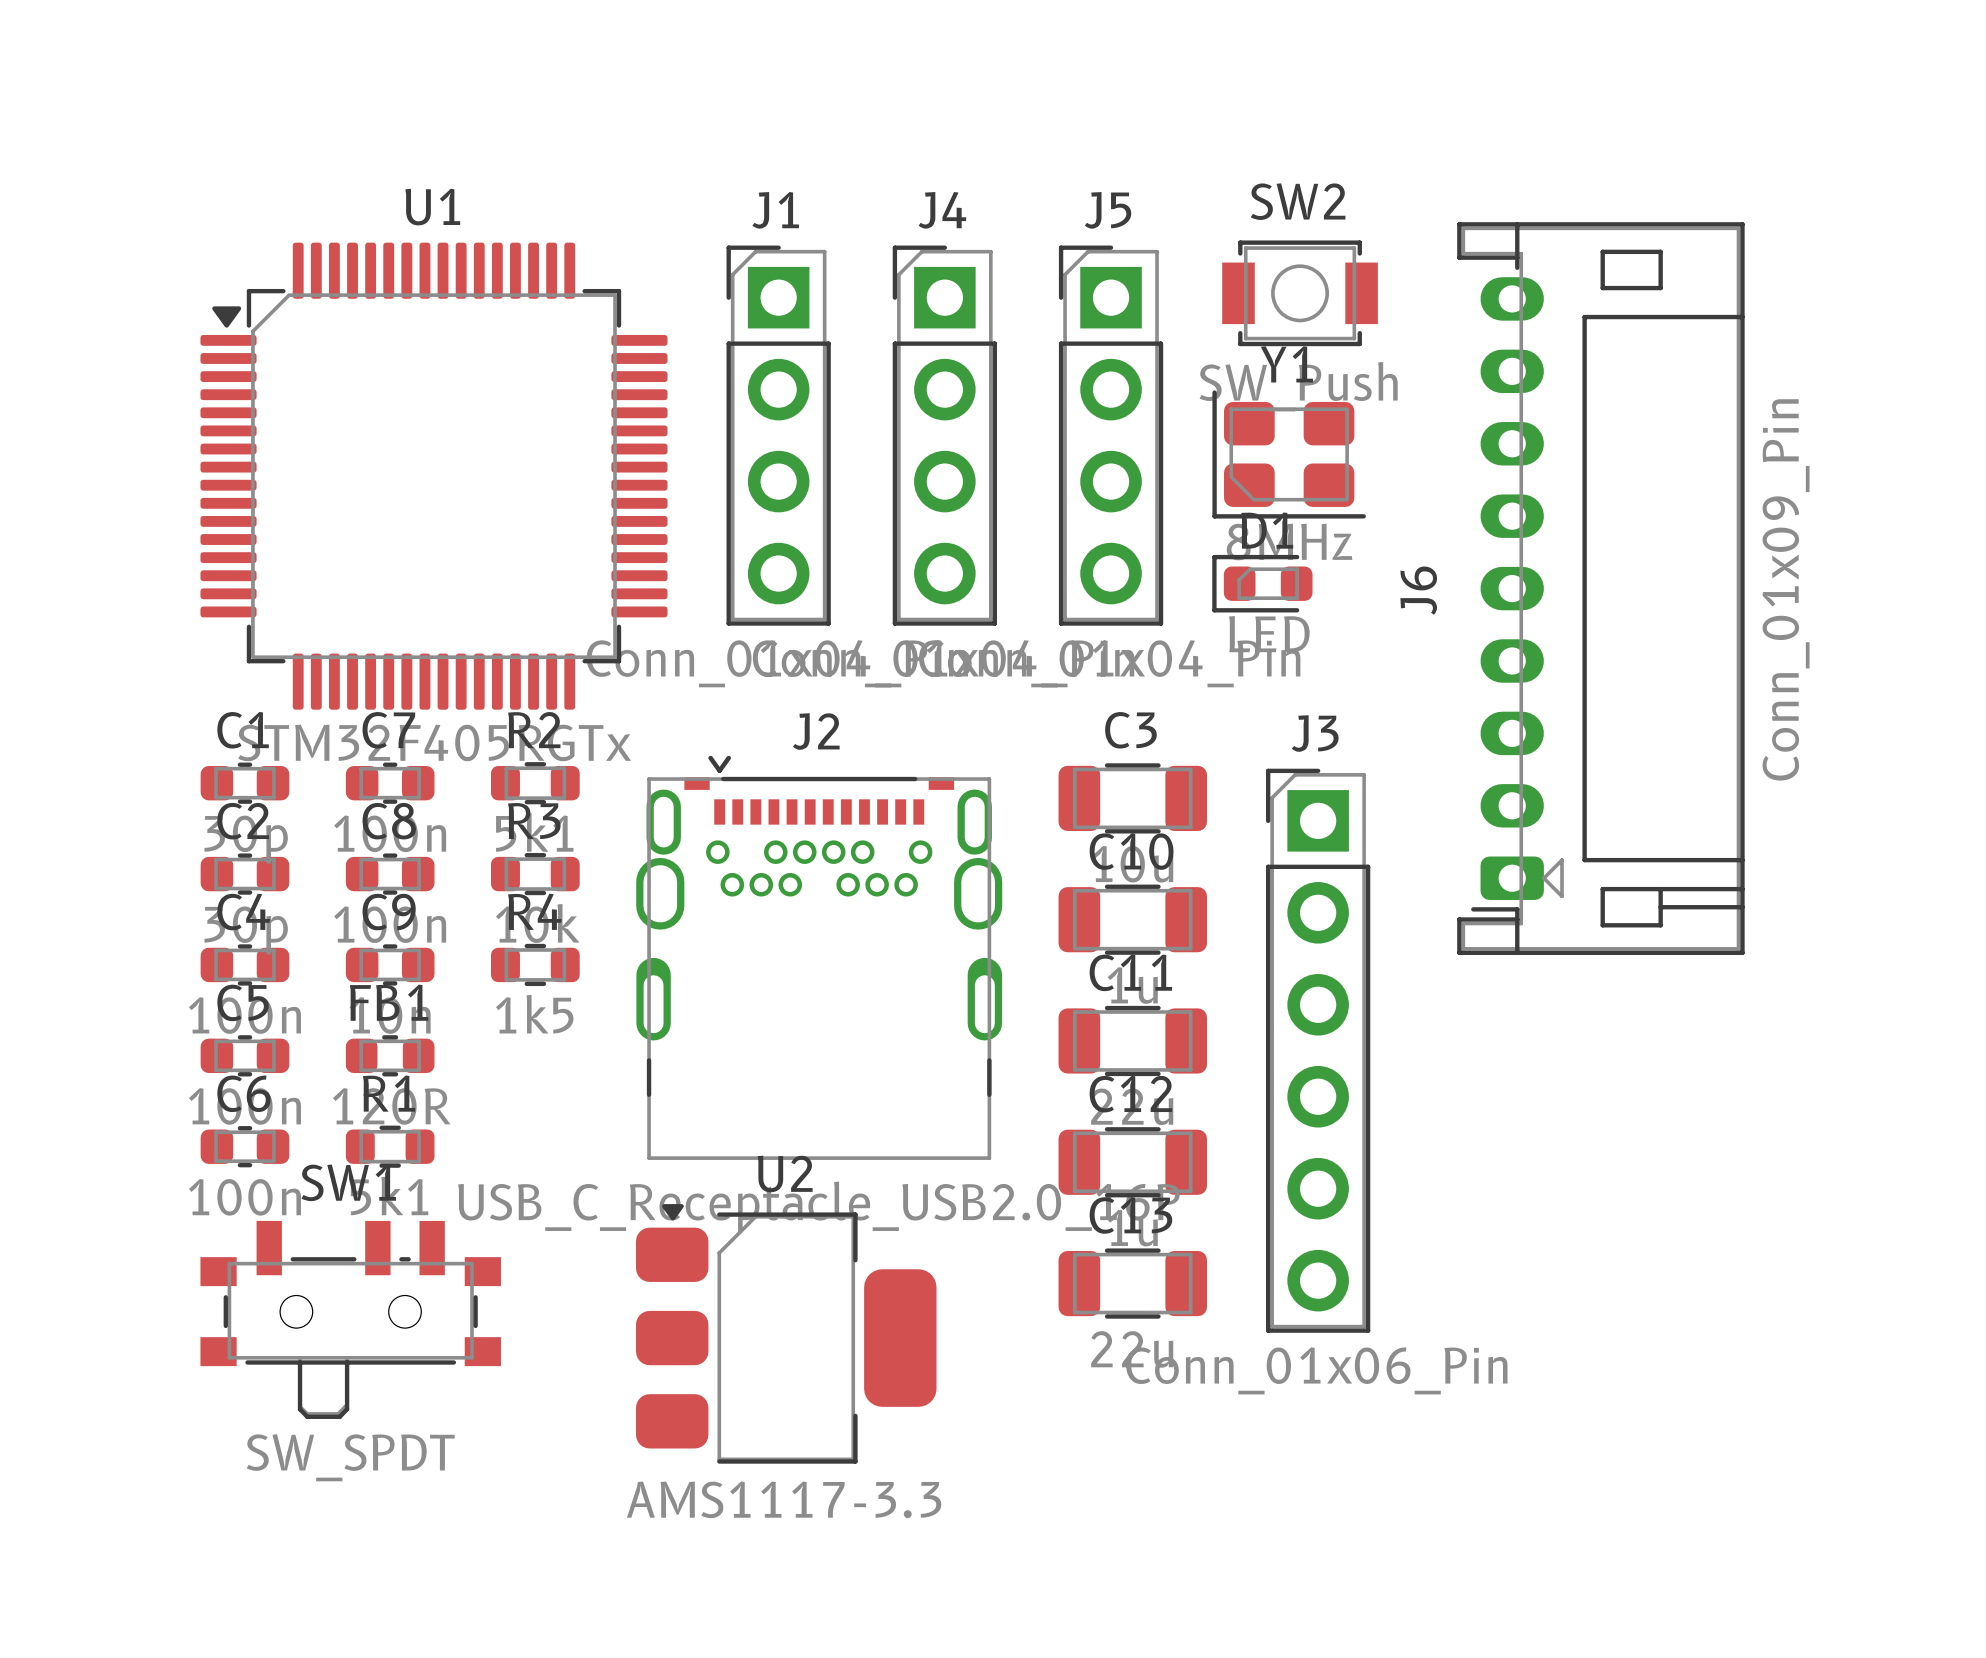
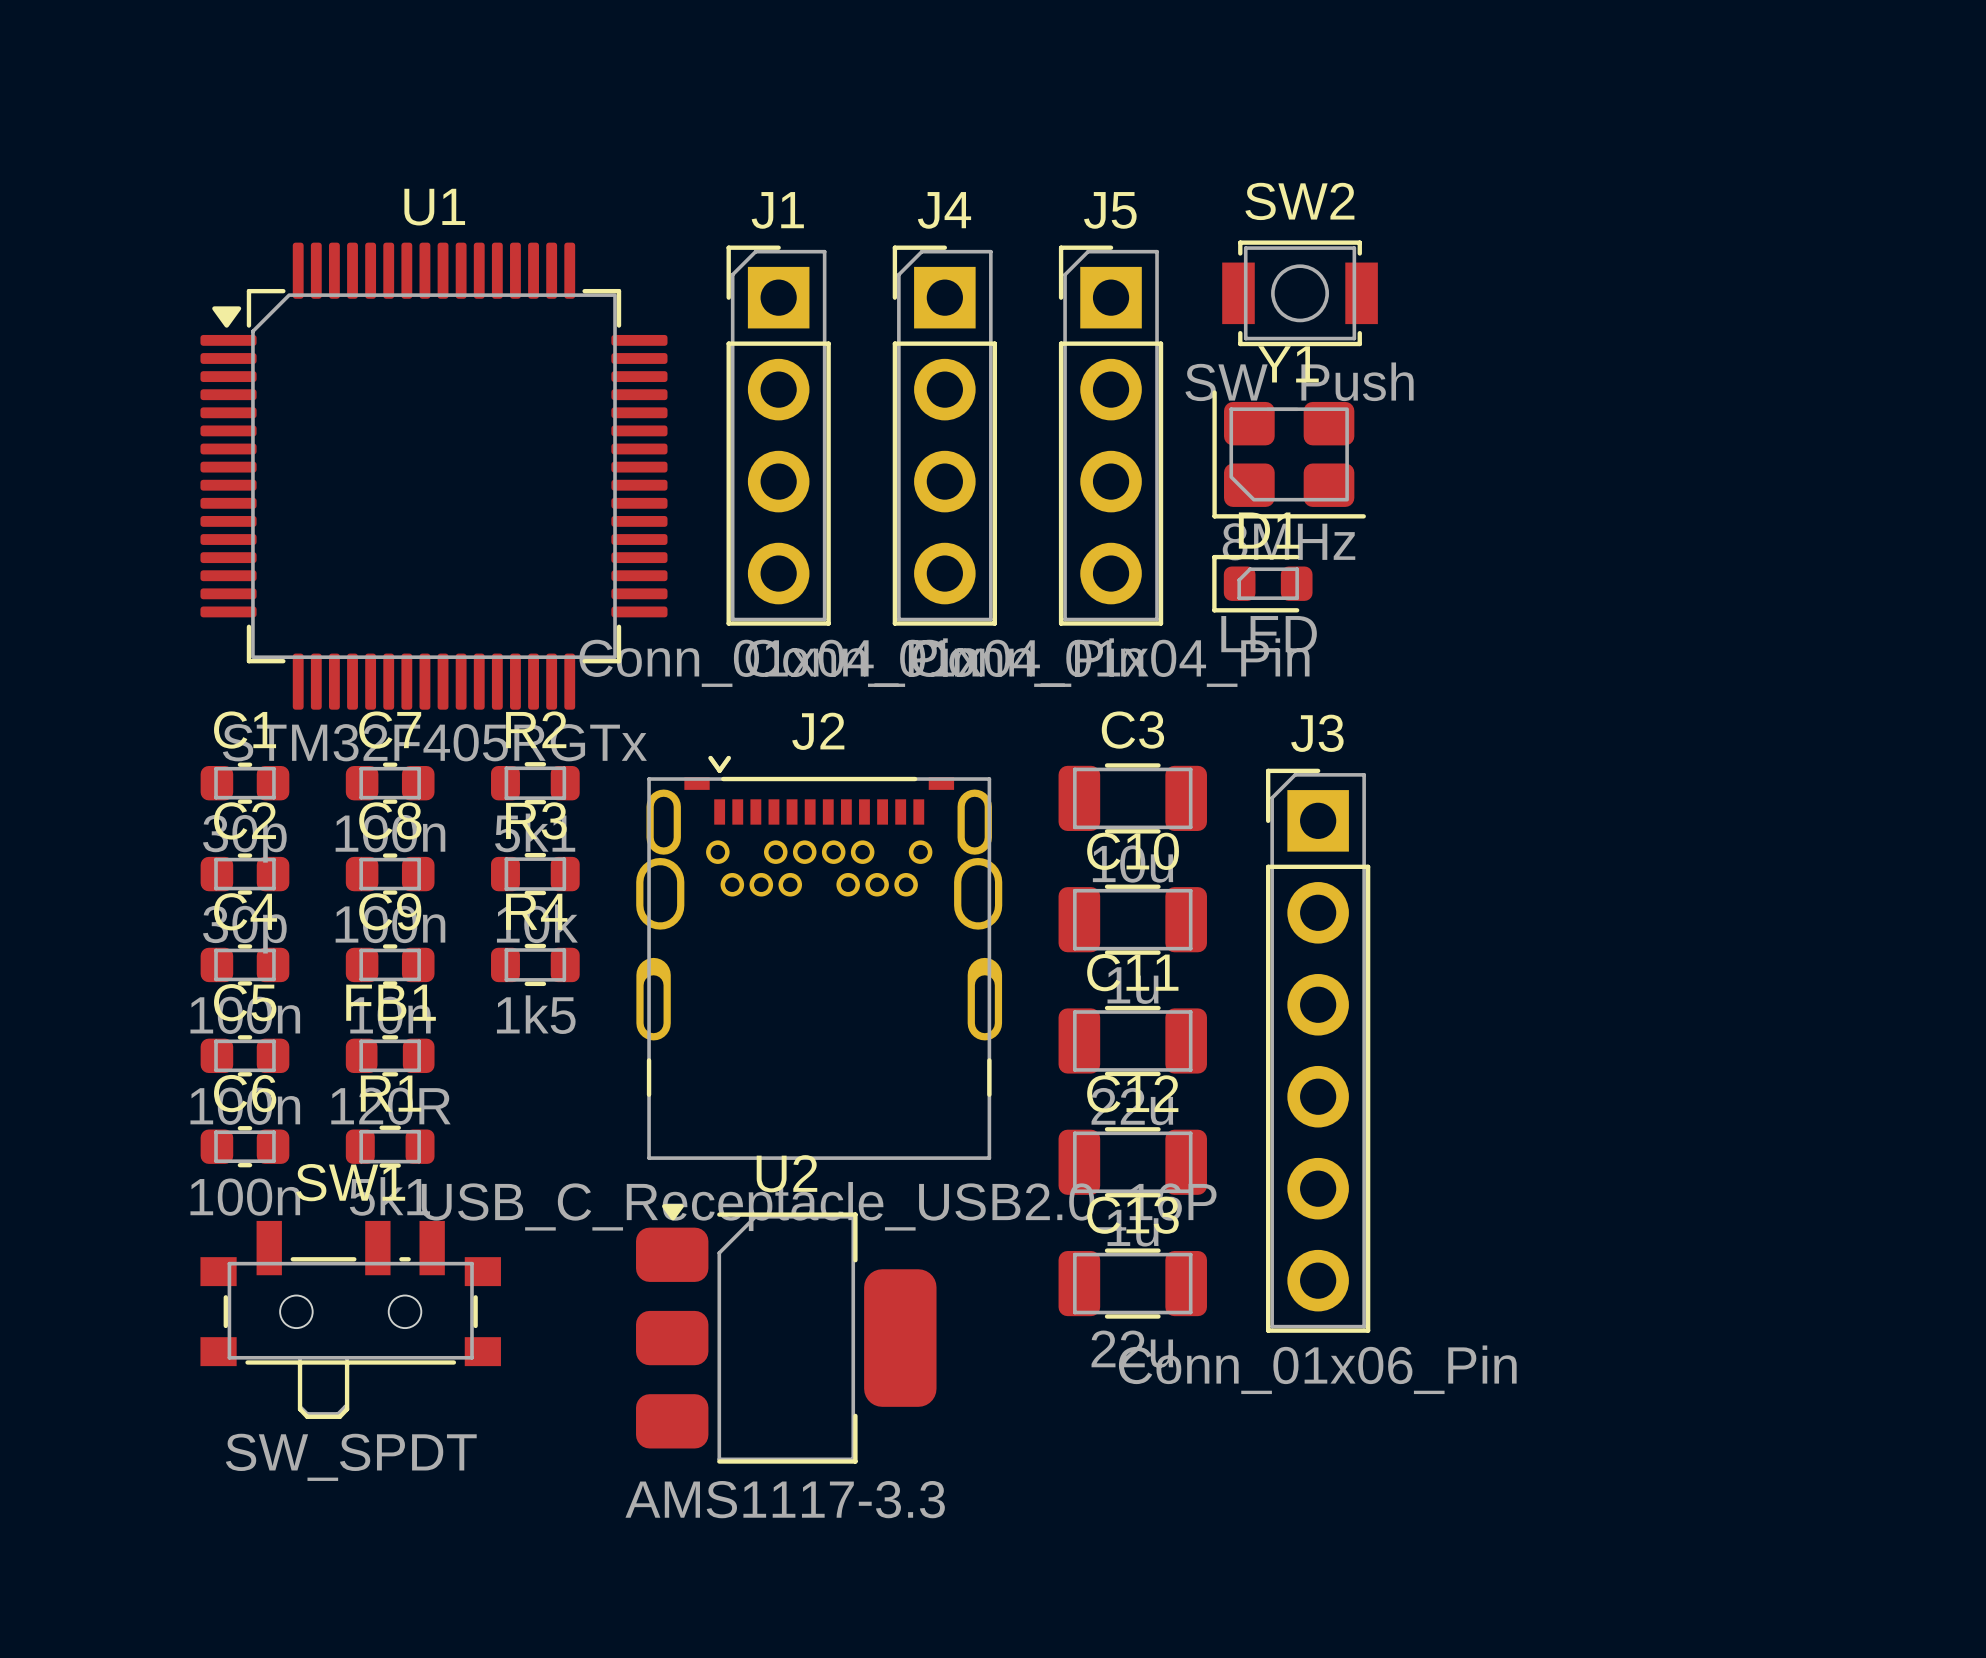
J6: Conn_01x09_Pin (1600, 588) -> none

